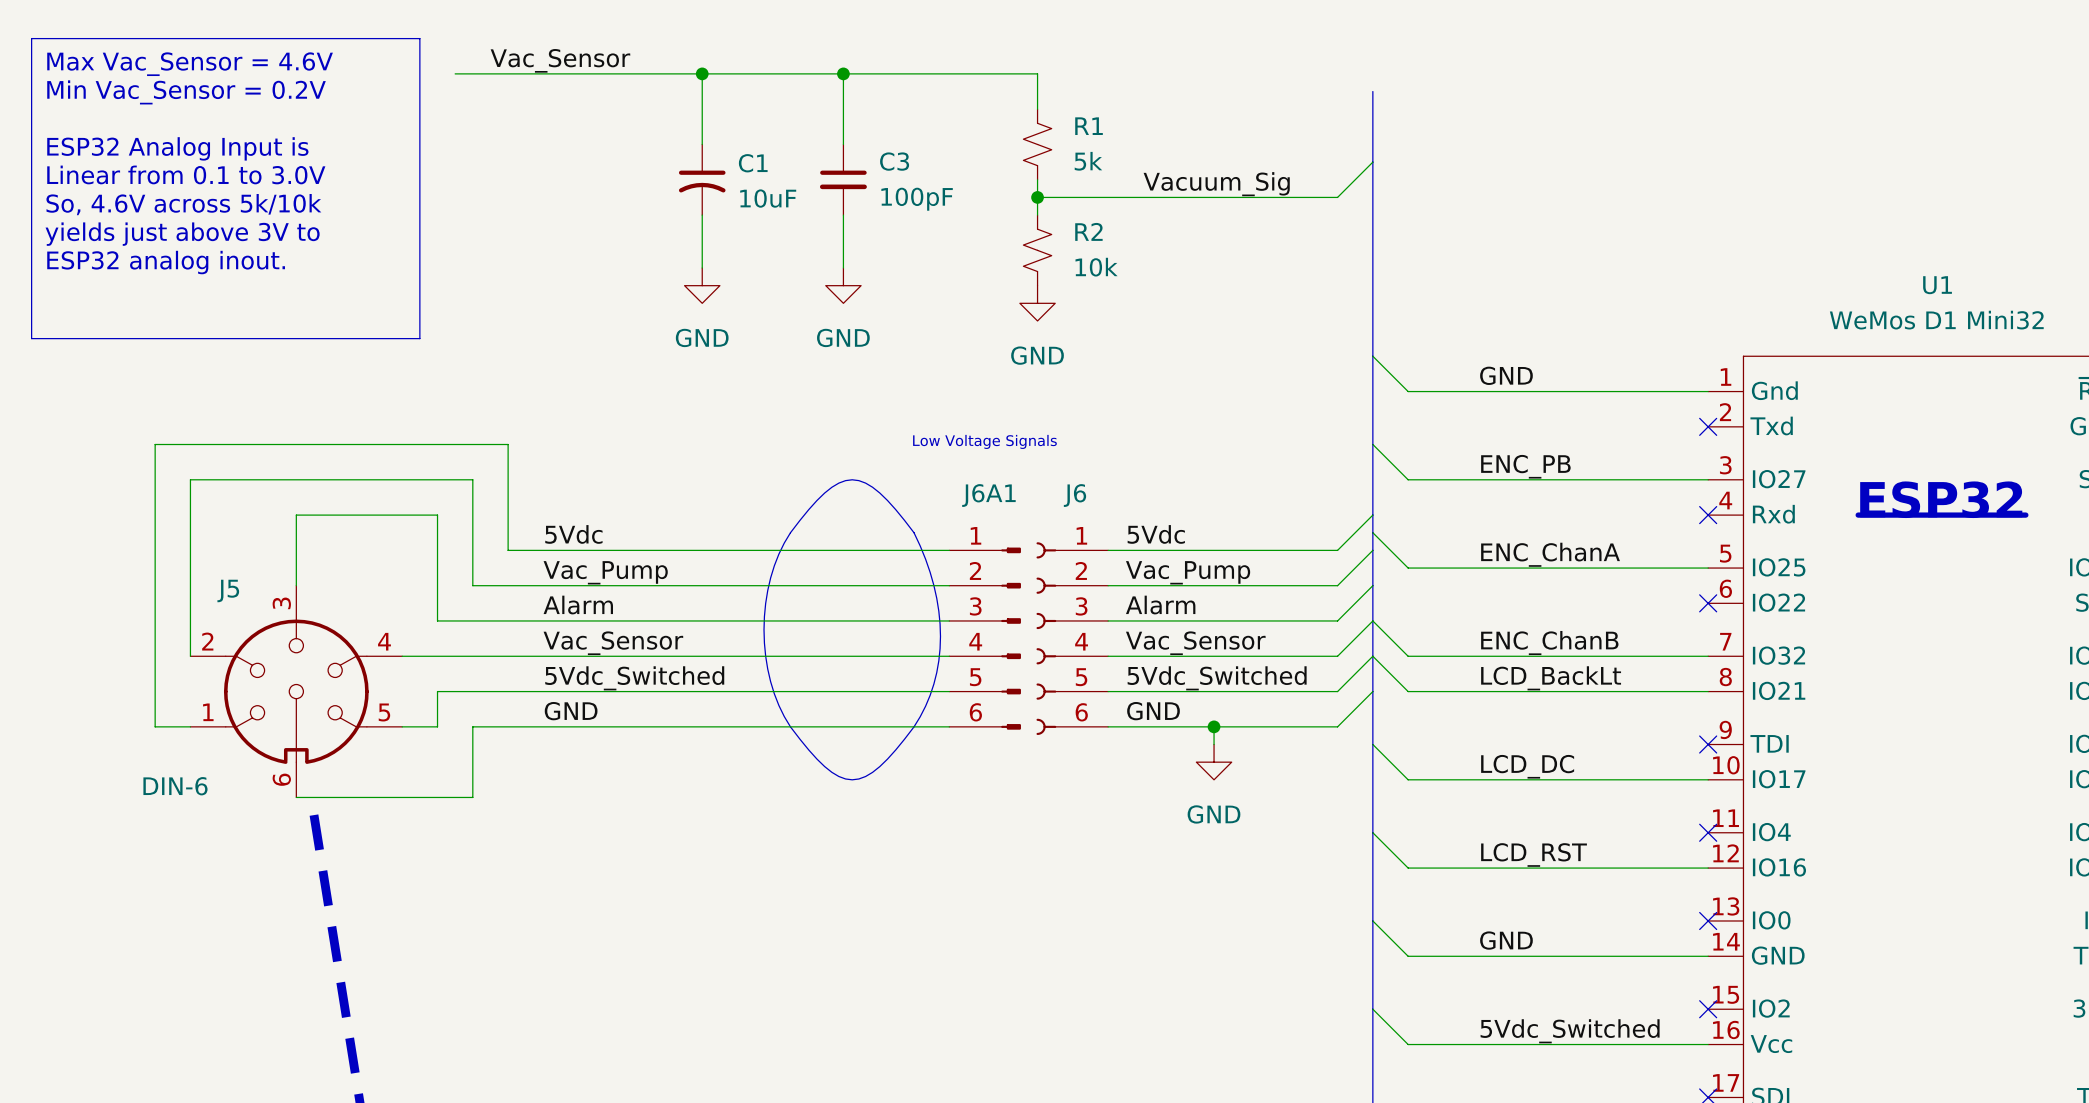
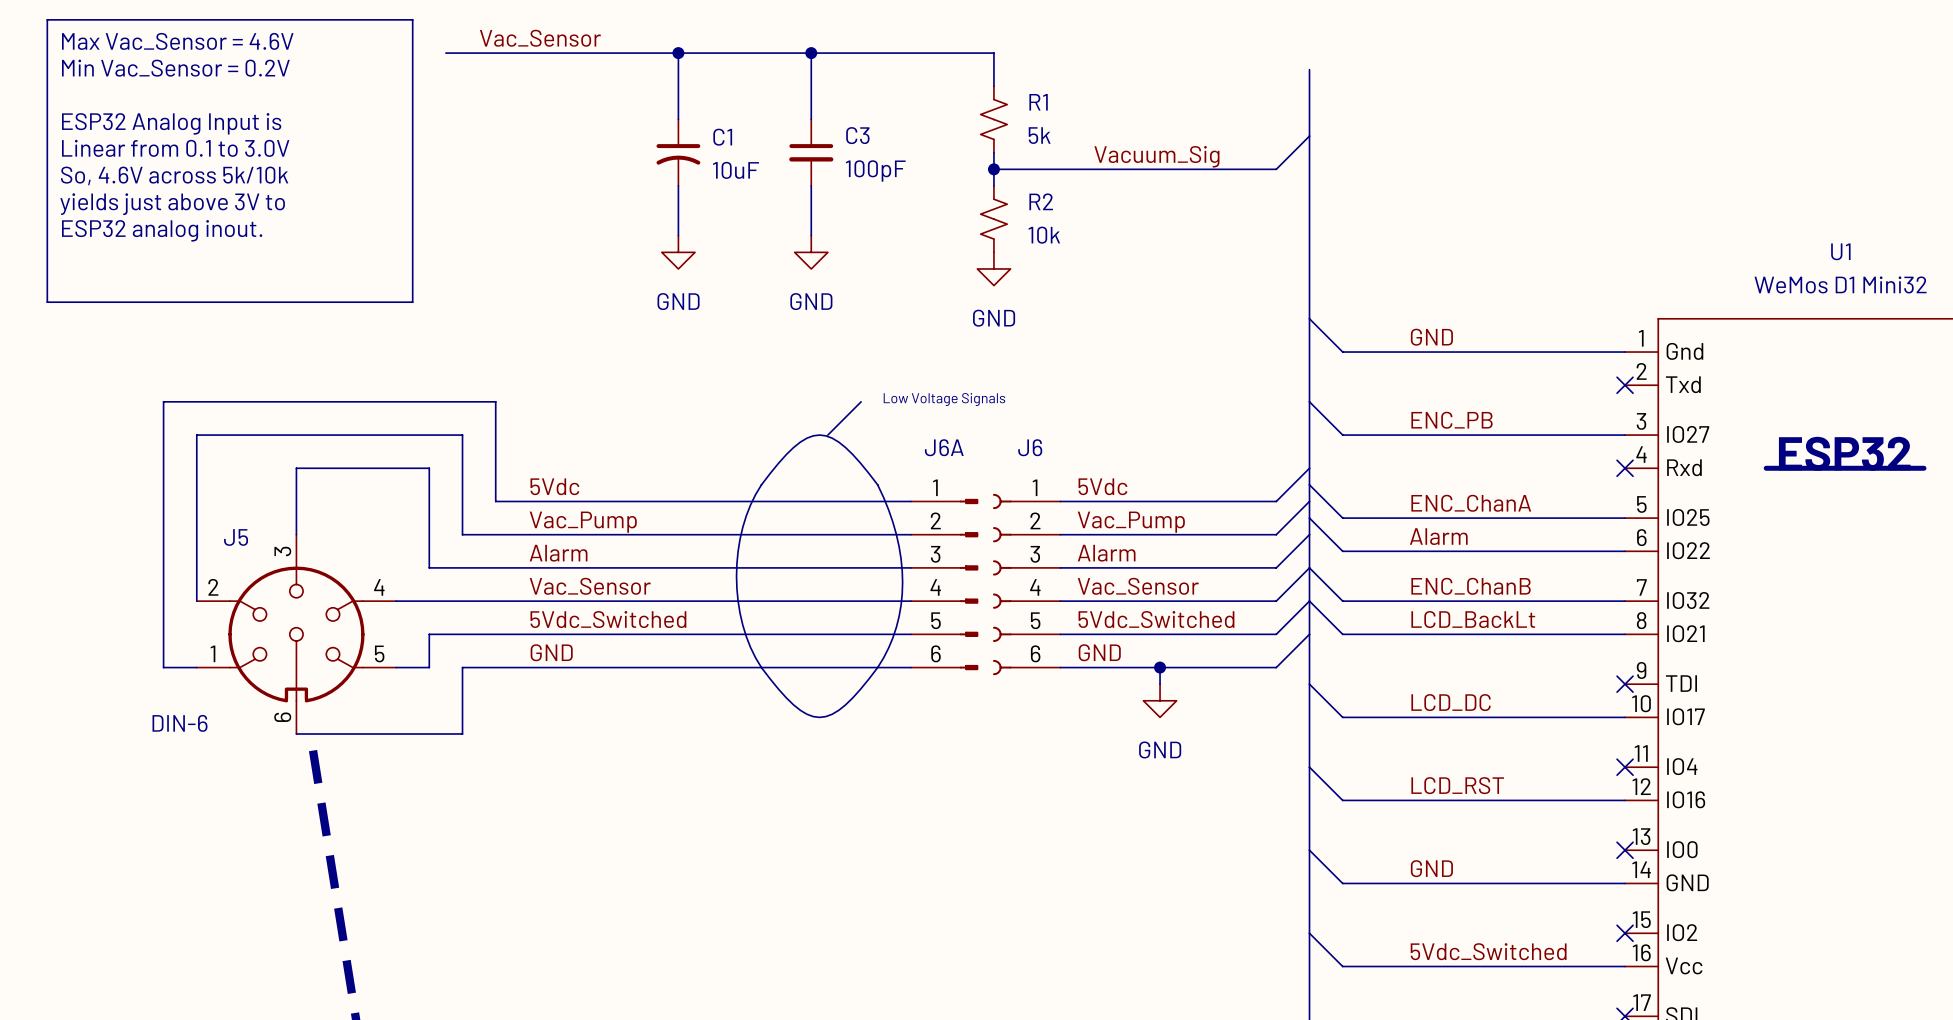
wire: none -> (861, 401) (827, 435)
J6A1 name: J6A1 (988, 495) -> J6A (944, 447)
wire: none -> (1309, 518) (1342, 551) (1625, 551)
label: none -> Alarm (1438, 536)
no-connect mark: (1708, 603) -> none

